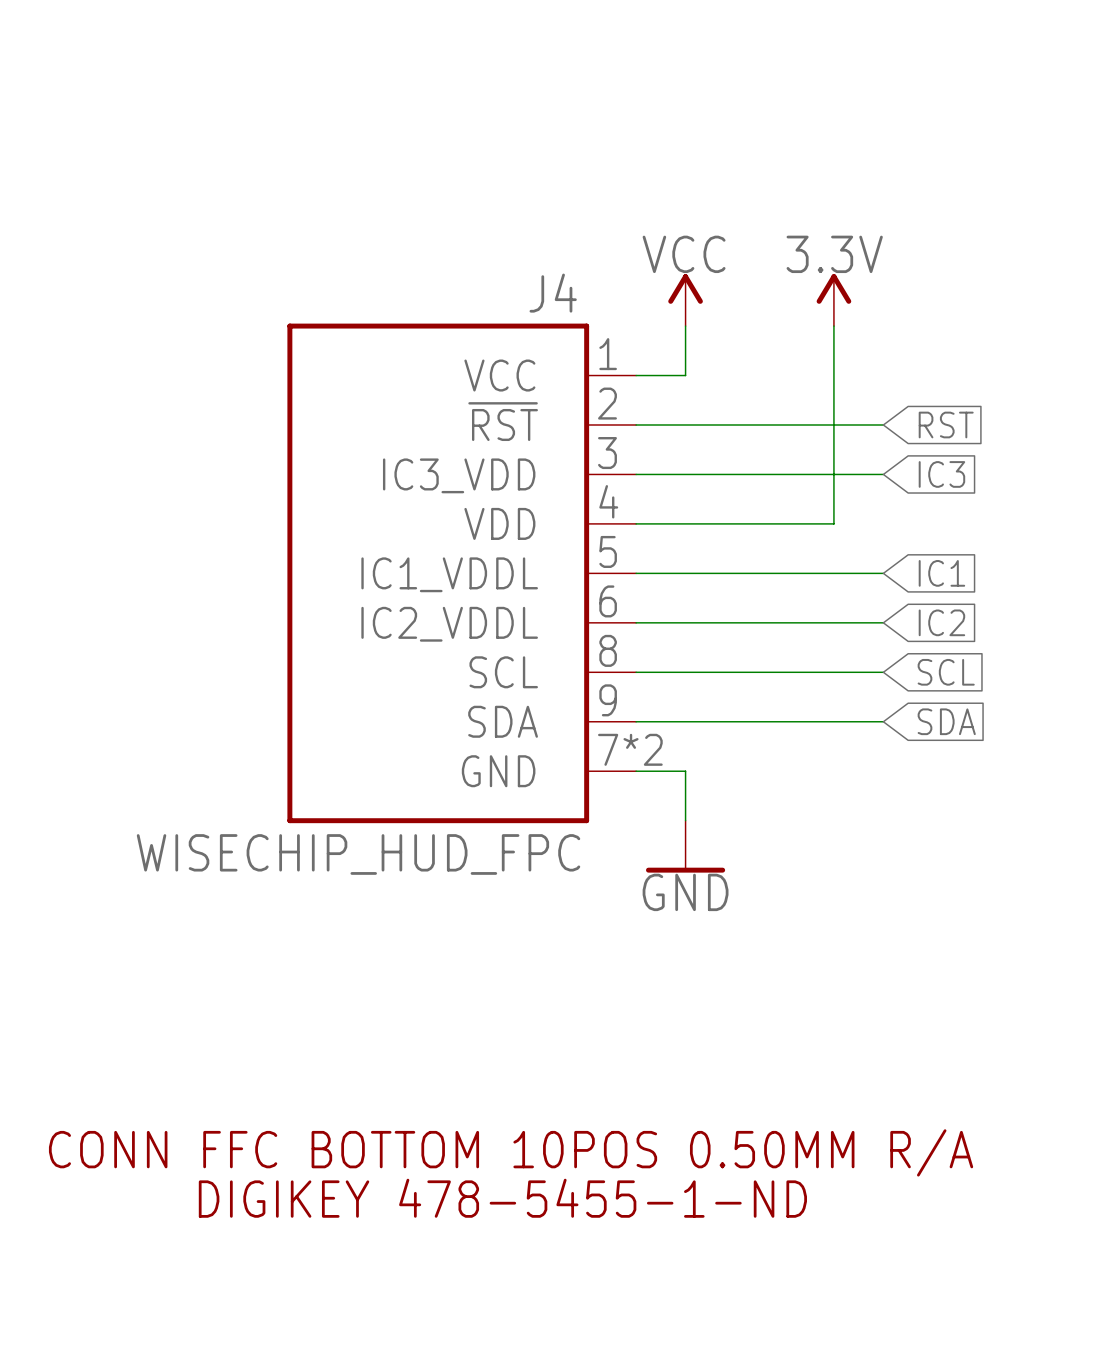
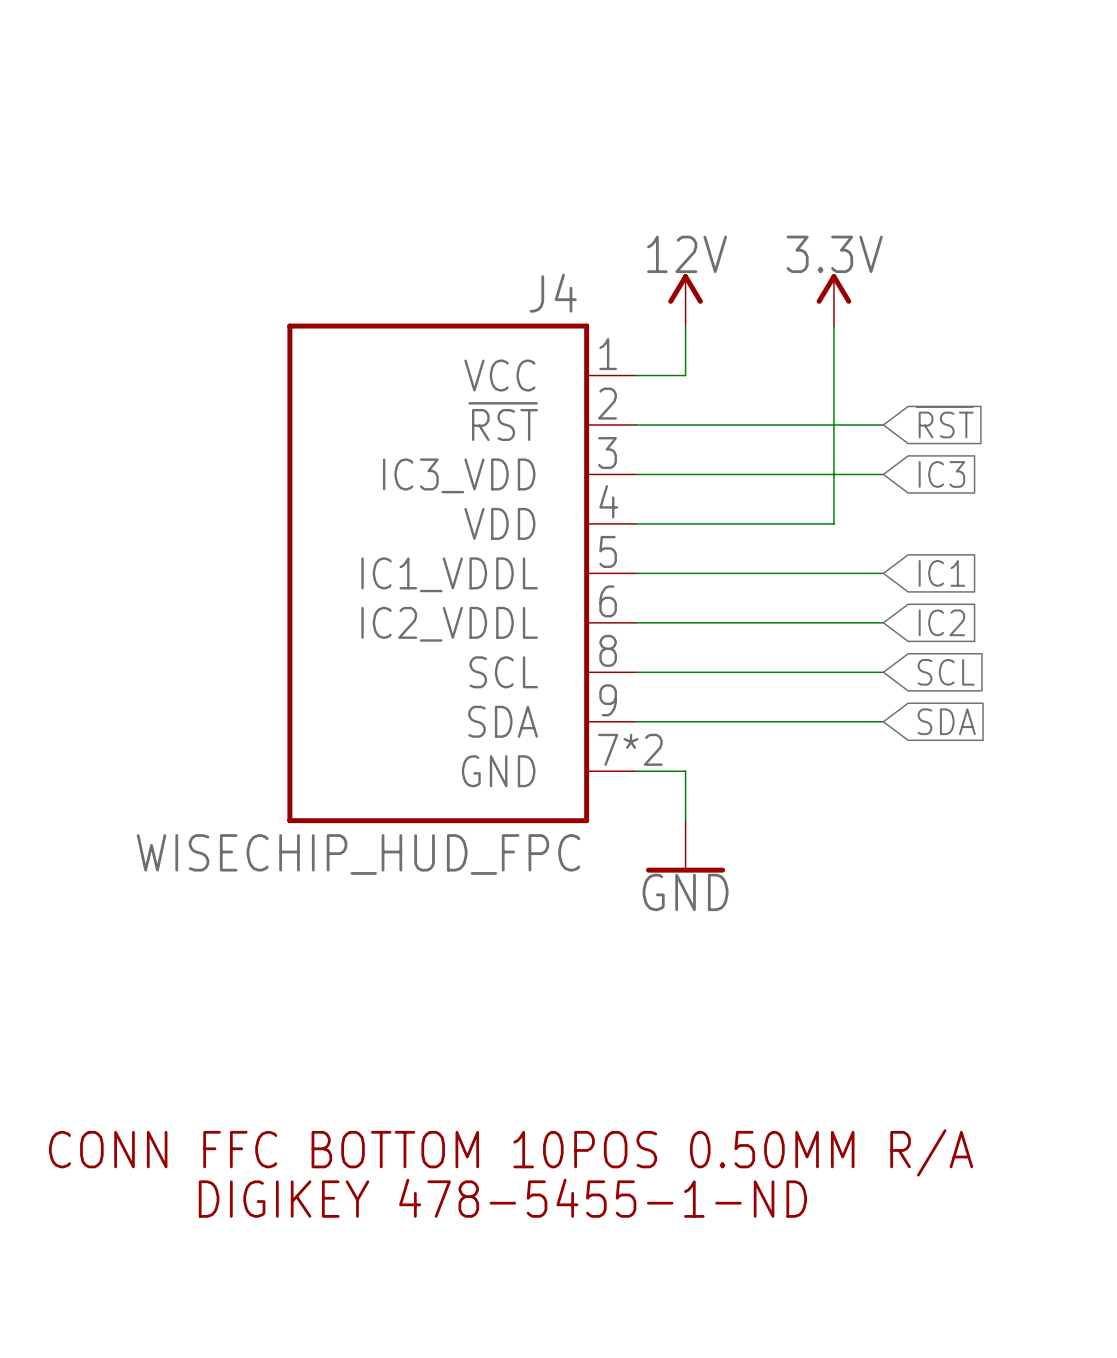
power symbol: VCC (685, 300) -> 12V (685, 300)
global label: RST (946, 424) -> ~{RST} (944, 422)

